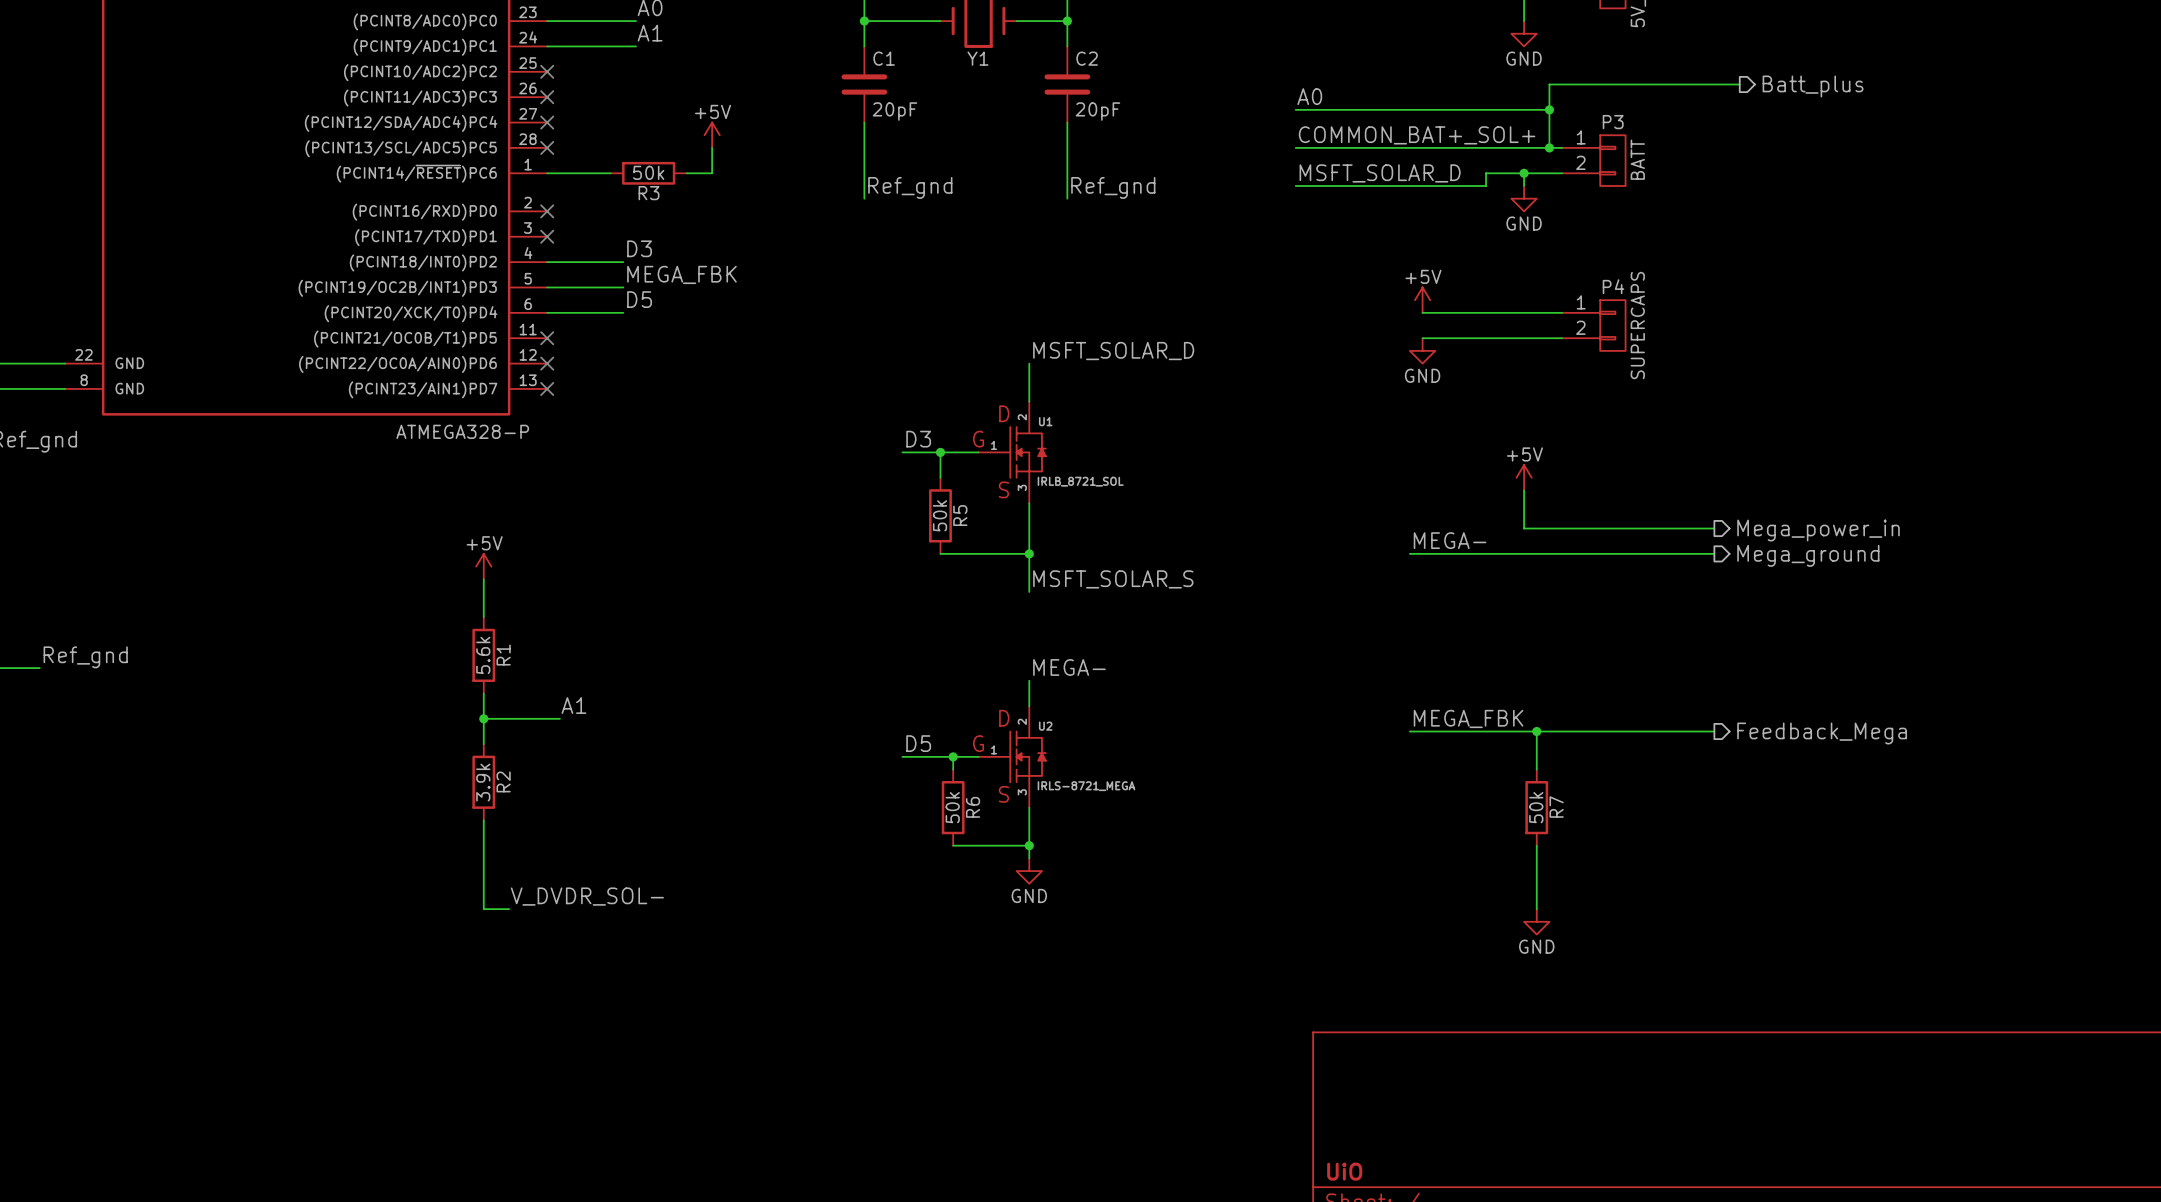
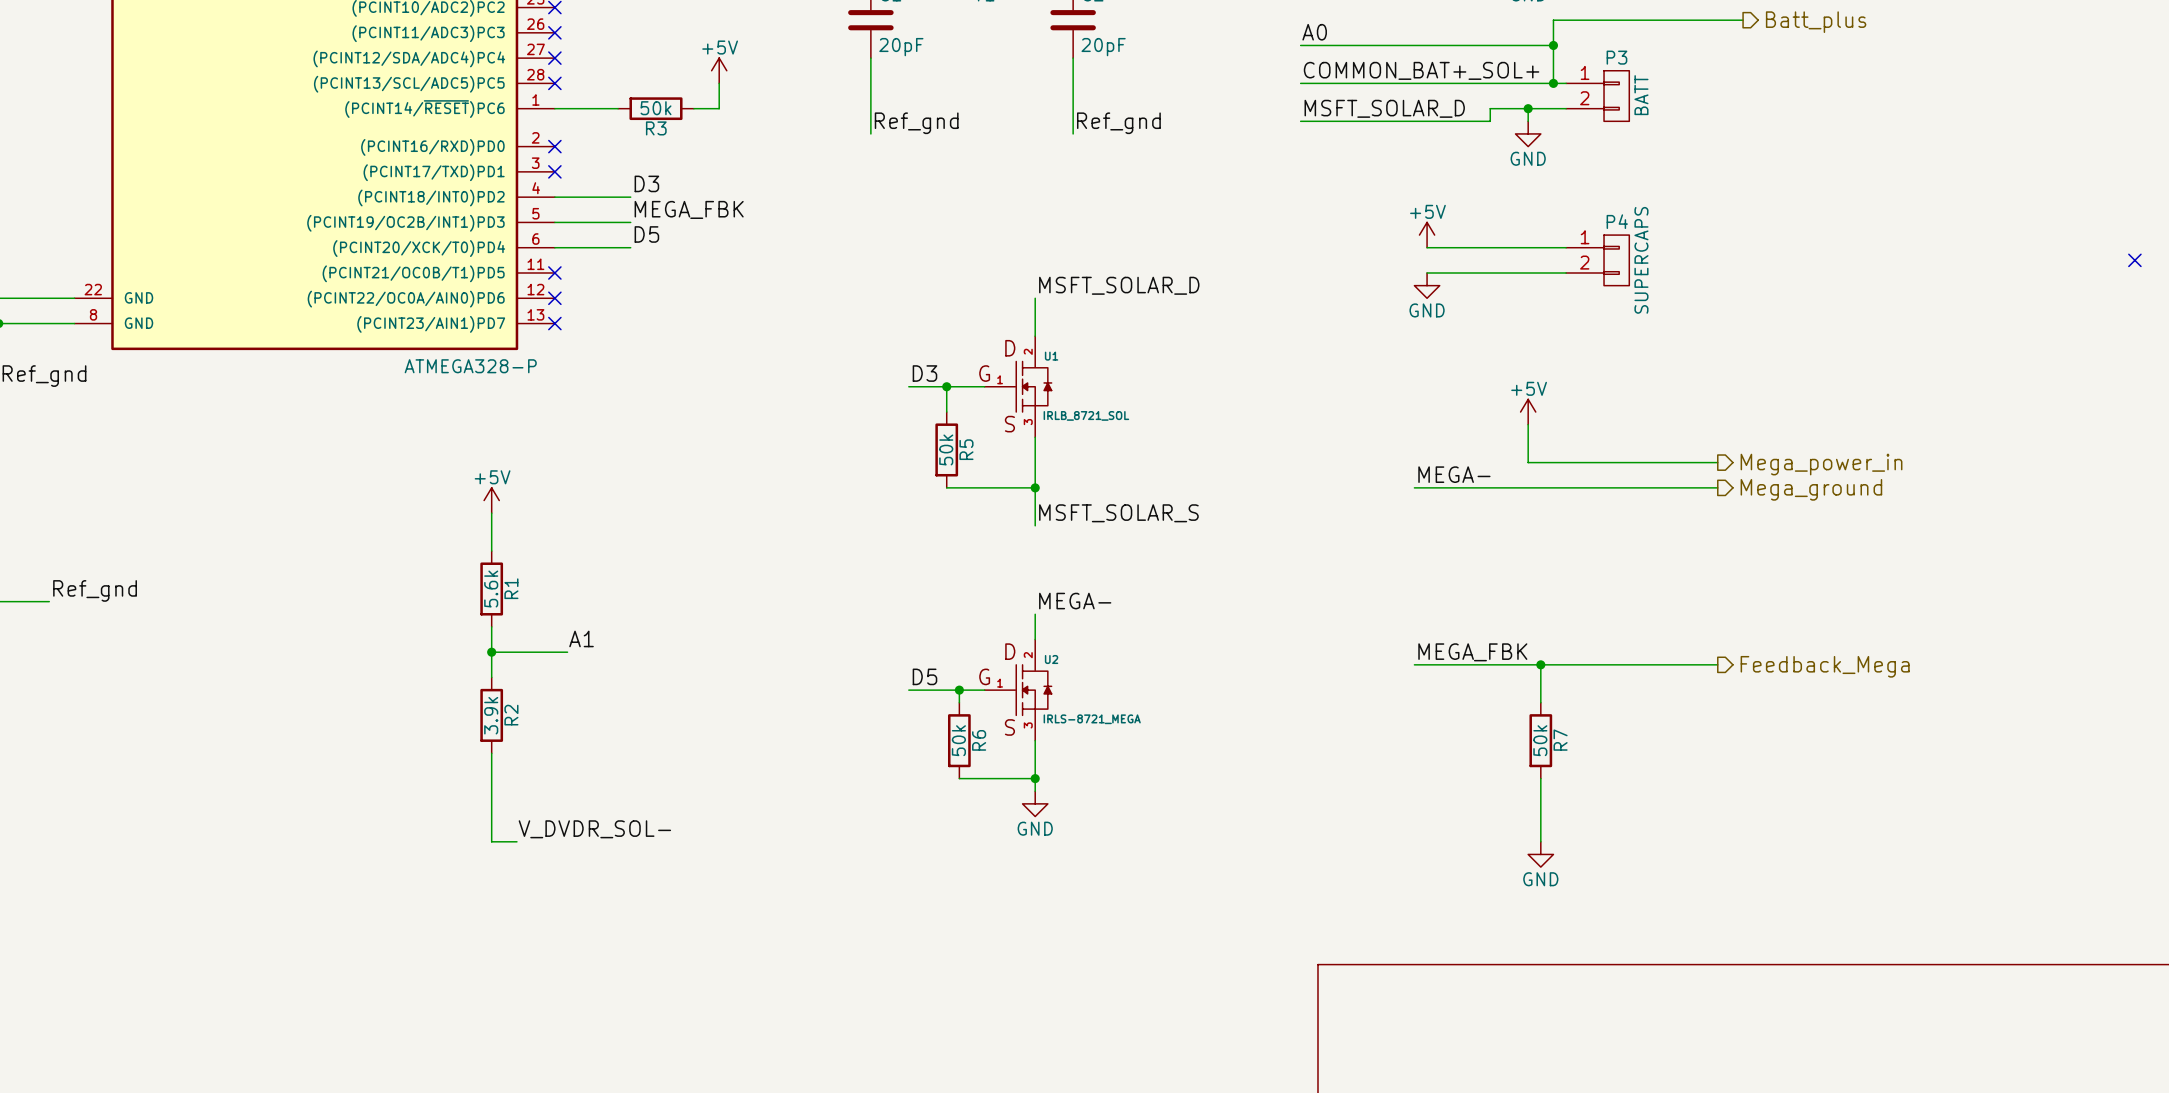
no-connect mark: none -> (2134, 260)

